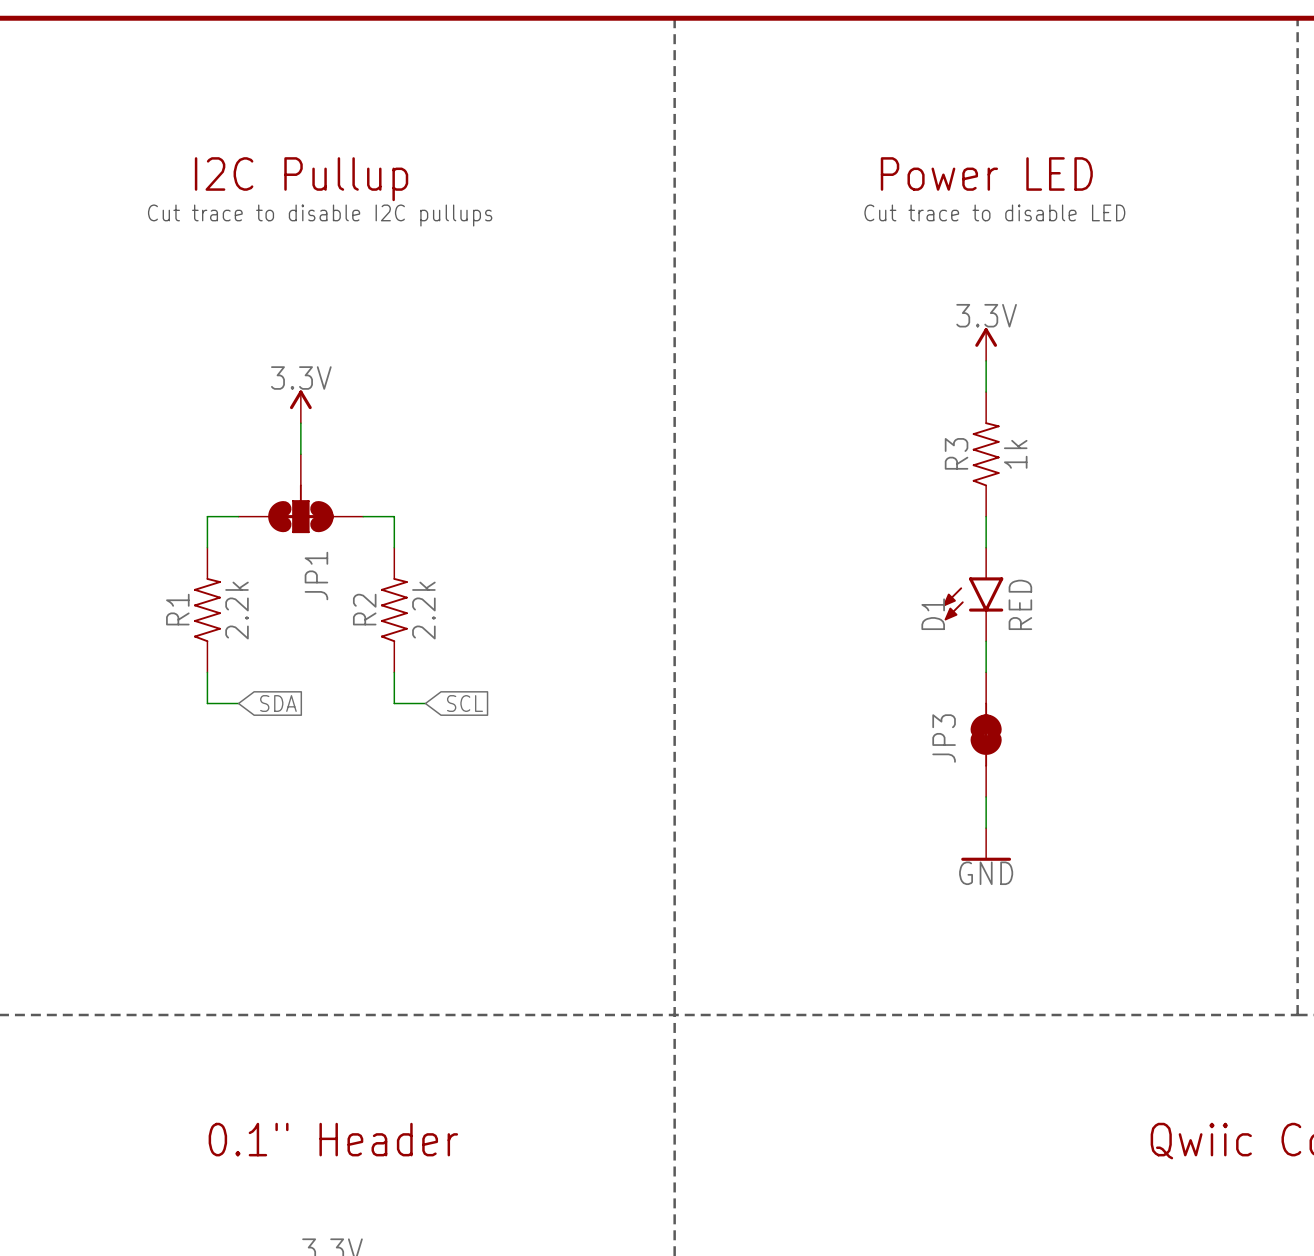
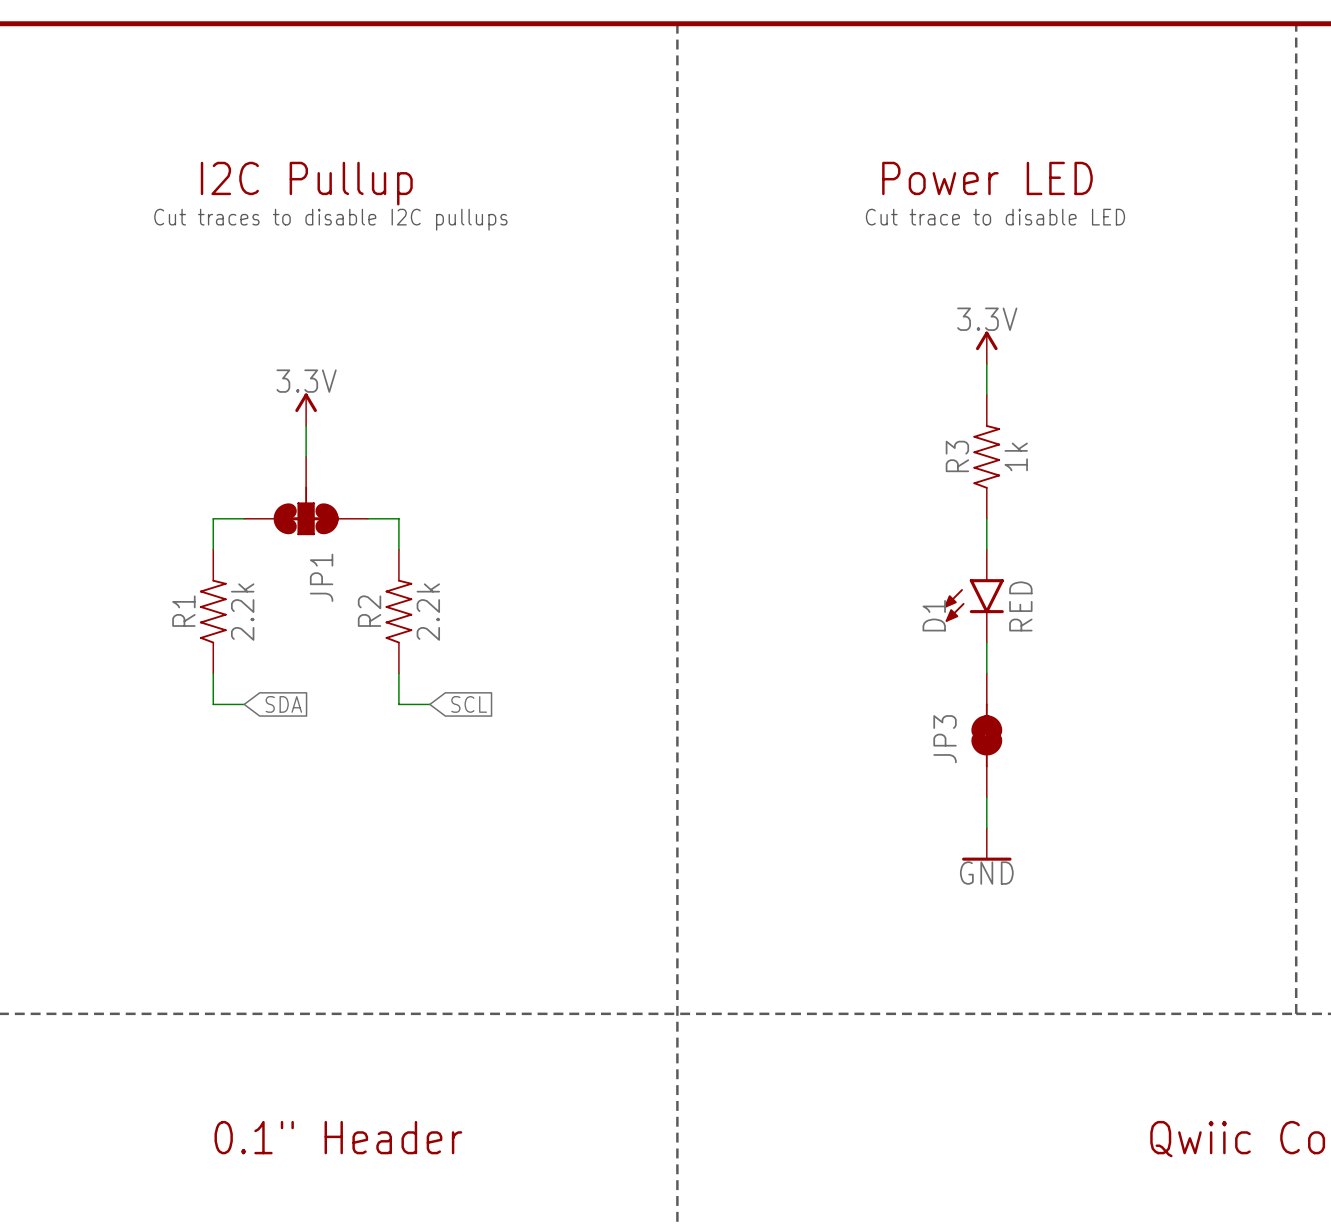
text: Cut trace to disable I2C pullups (320, 215) -> Cut traces to disable I2C pullups (330, 219)

